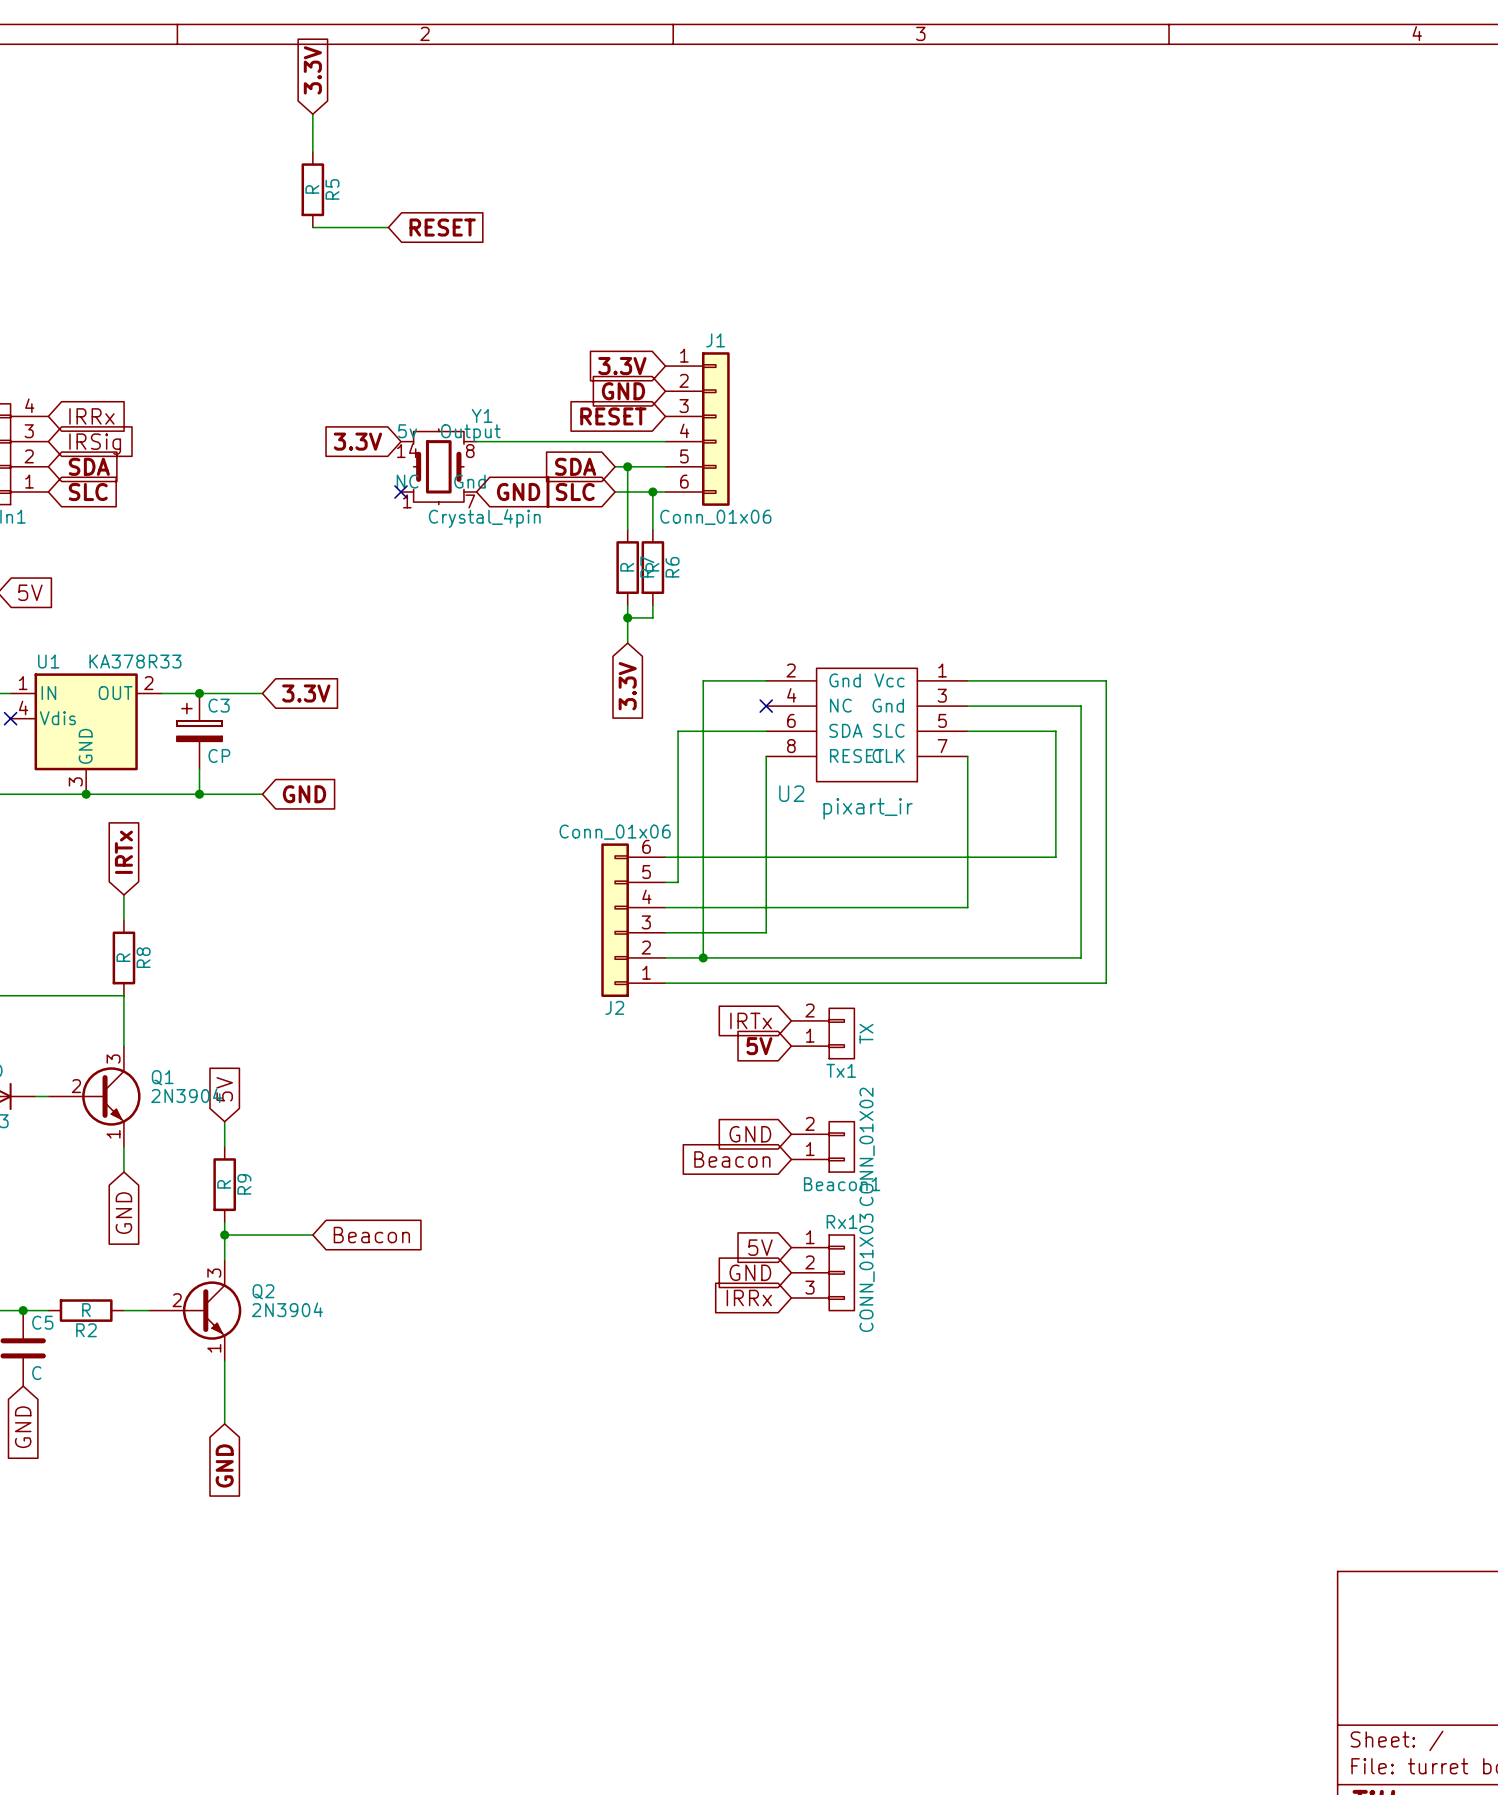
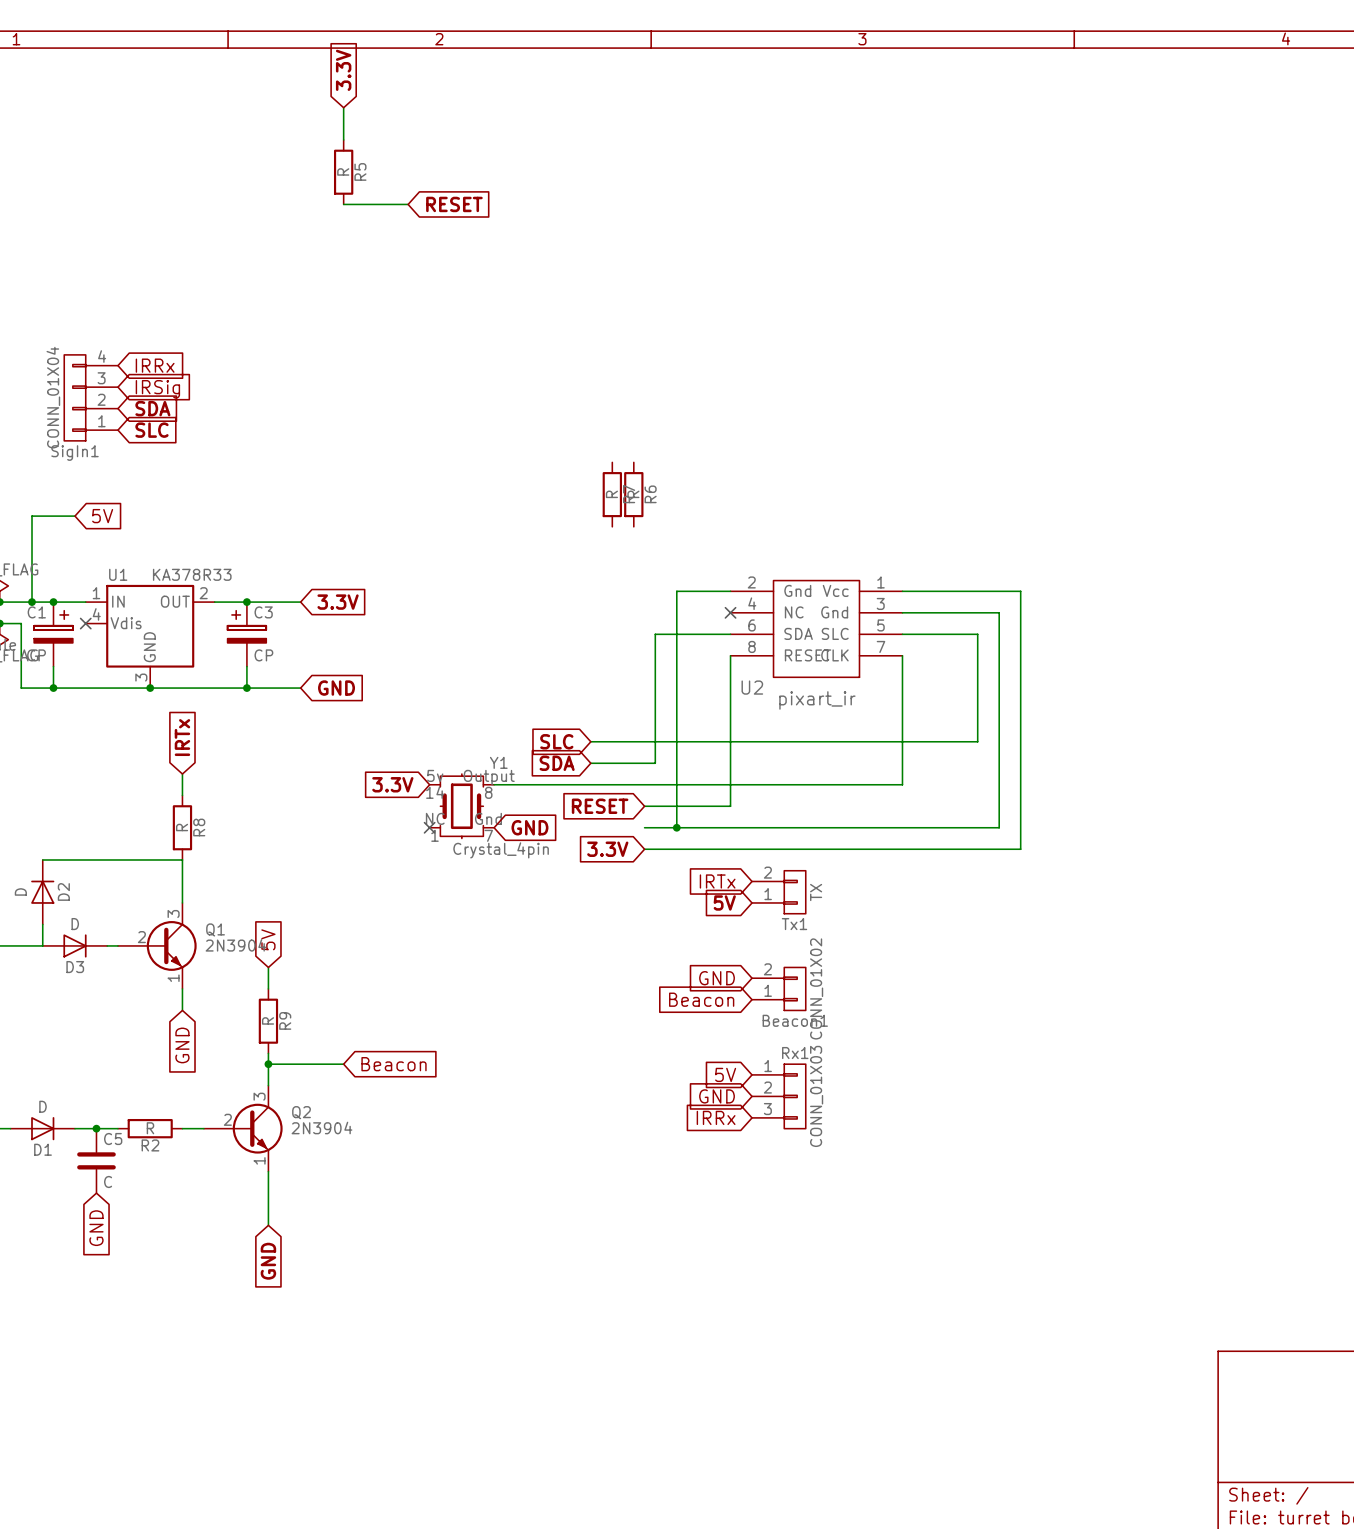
global label: 3.3V (622, 366) -> none
global label: GND (623, 391) -> none
global label: RESET (613, 416) -> none
J1: Conn_01x06 (697, 429) -> none
global label: 3.3V (357, 441) -> none
wire: (476, 441) (665, 441) -> none
Y1 position: (438, 466) -> (461, 806)
global label: SDA (575, 466) -> none
wire: (615, 466) (665, 466) -> none
wire: (627, 466) (627, 529) -> none
junction: (627, 466) -> none
no-connect mark: (401, 492) -> none
global label: GND (518, 492) -> none
global label: SLC (575, 492) -> none
wire: (615, 492) (665, 492) -> none
wire: (652, 492) (652, 529) -> none
junction: (652, 492) -> none
wire: (627, 605) (627, 643) -> none
wire: (652, 605) (652, 617) (627, 617) -> none
junction: (627, 617) -> none
global label: 3.3V (627, 686) -> none
global label: none -> SLC (556, 741)
global label: none -> SDA (557, 763)
global label: none -> 3.3V (392, 784)
wire: none -> (494, 784) (644, 784)
J2: Conn_01x06 (633, 920) -> none
global label: none -> RESET (600, 806)
no-connect mark: none -> (429, 827)
global label: none -> GND (529, 827)
global label: none -> 3.3V (607, 849)

